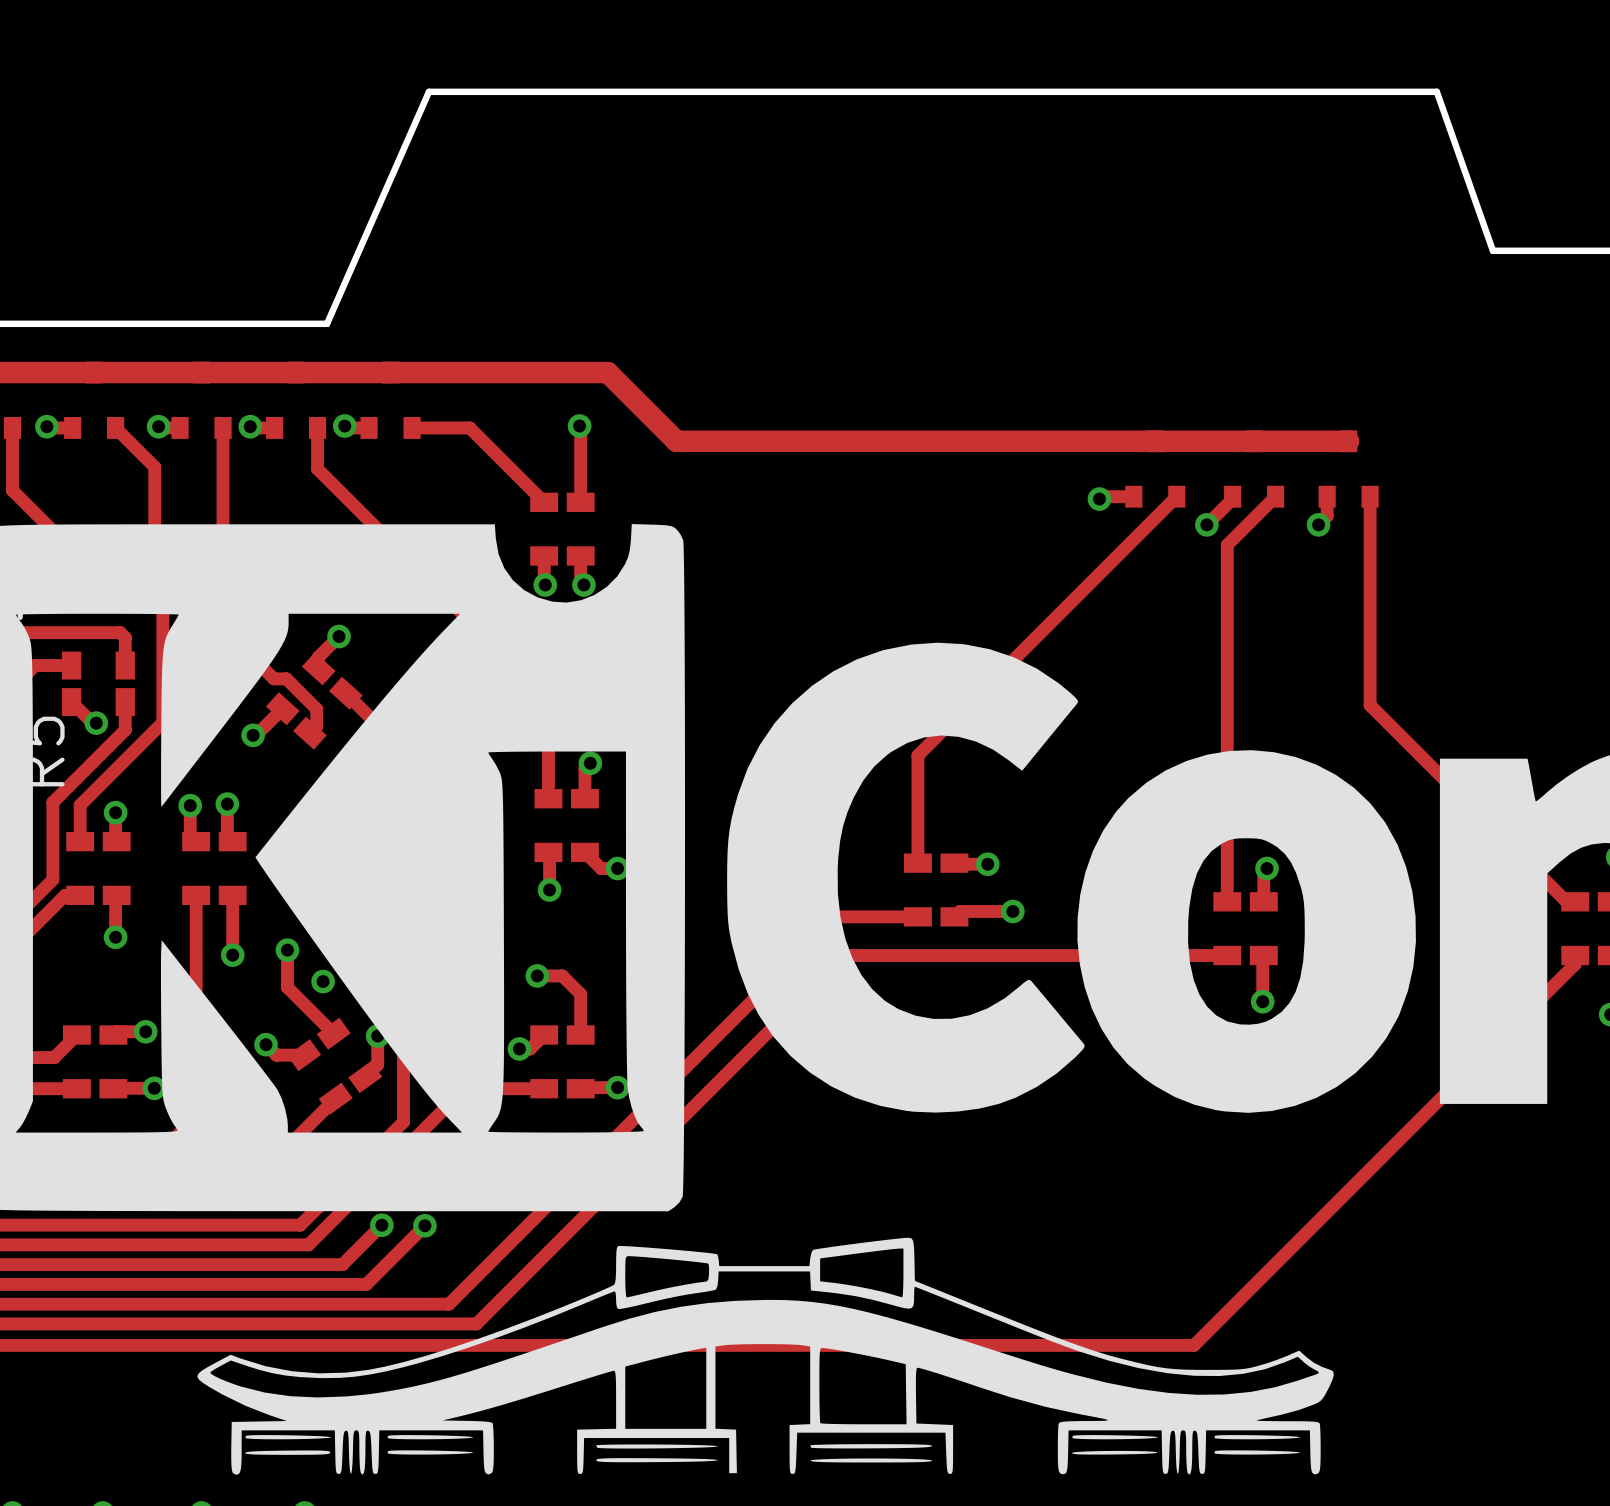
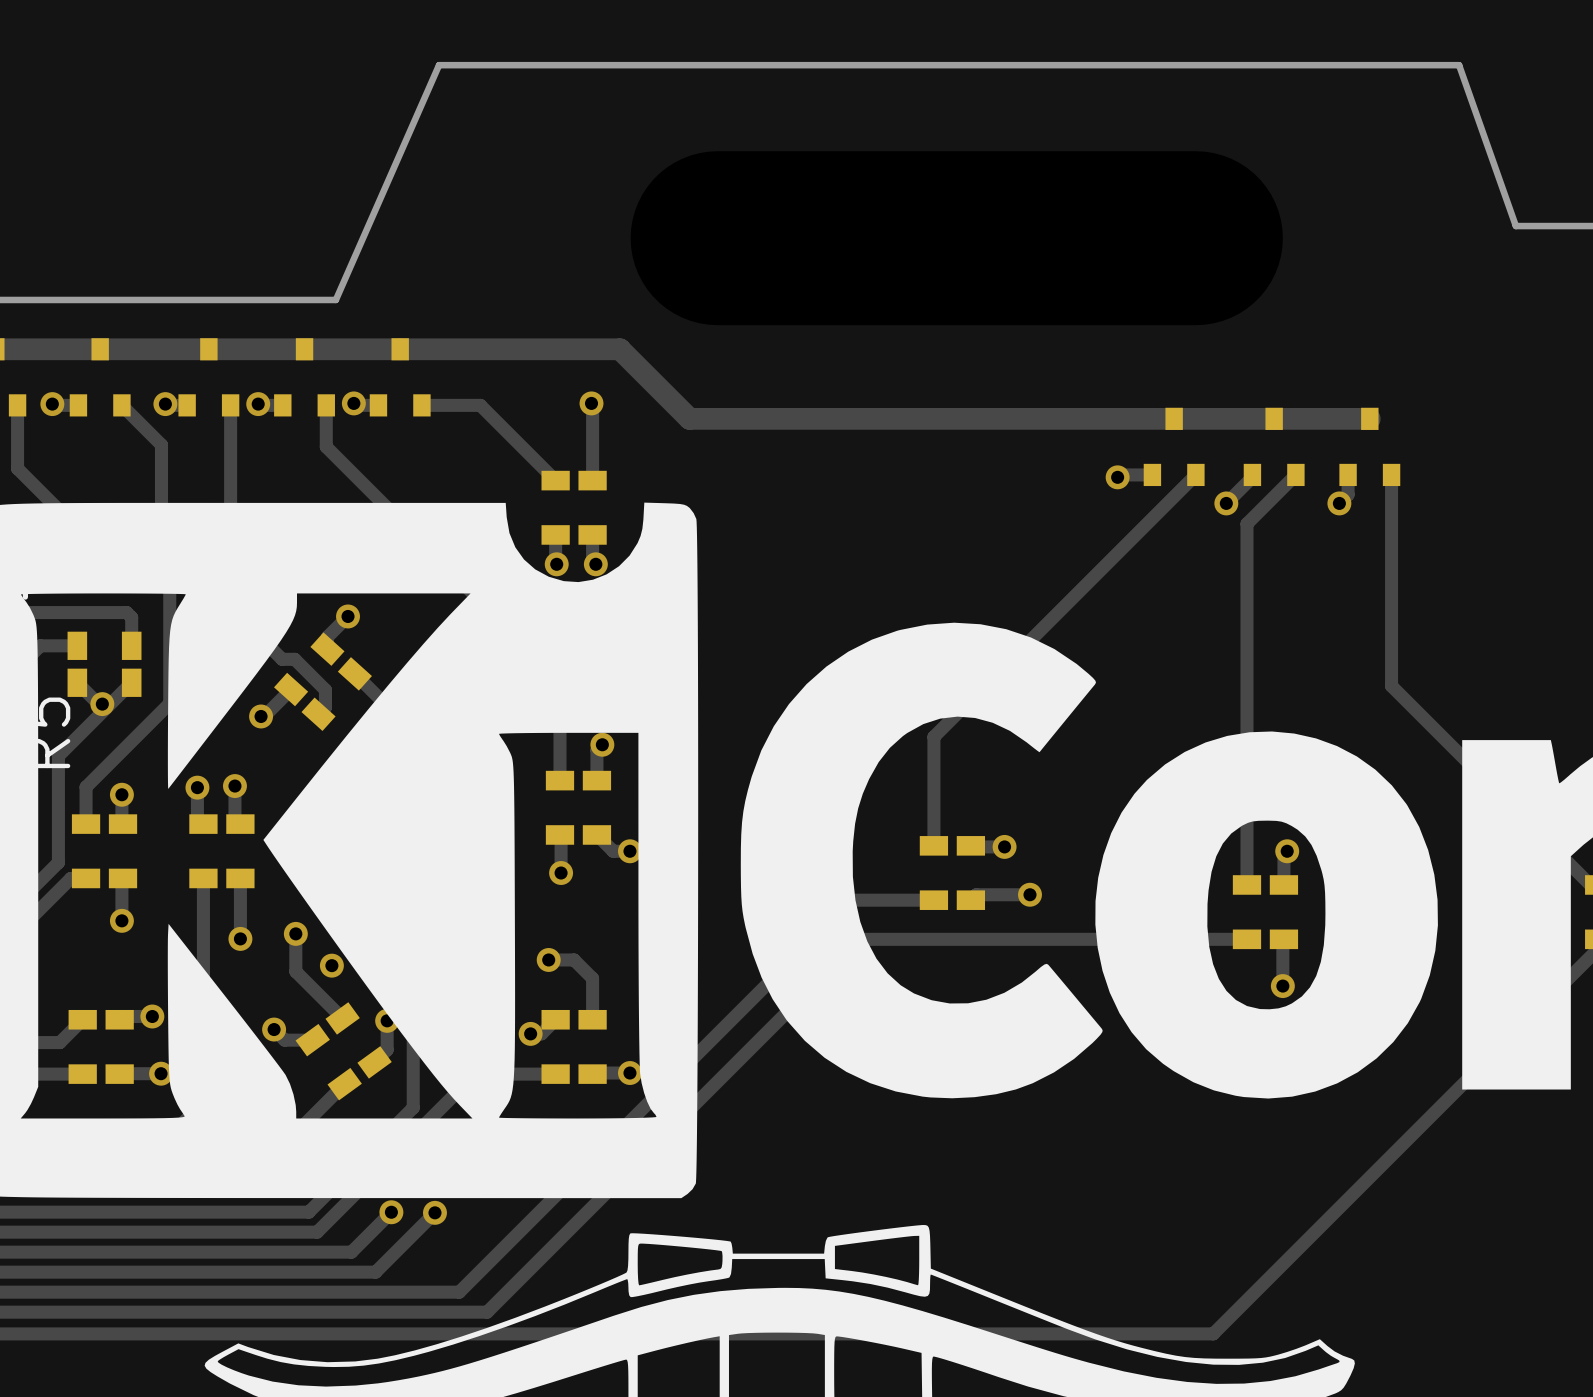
track: (125, 702) (125, 729) (52, 802) -> (131, 682) (58, 756) (58, 784)

